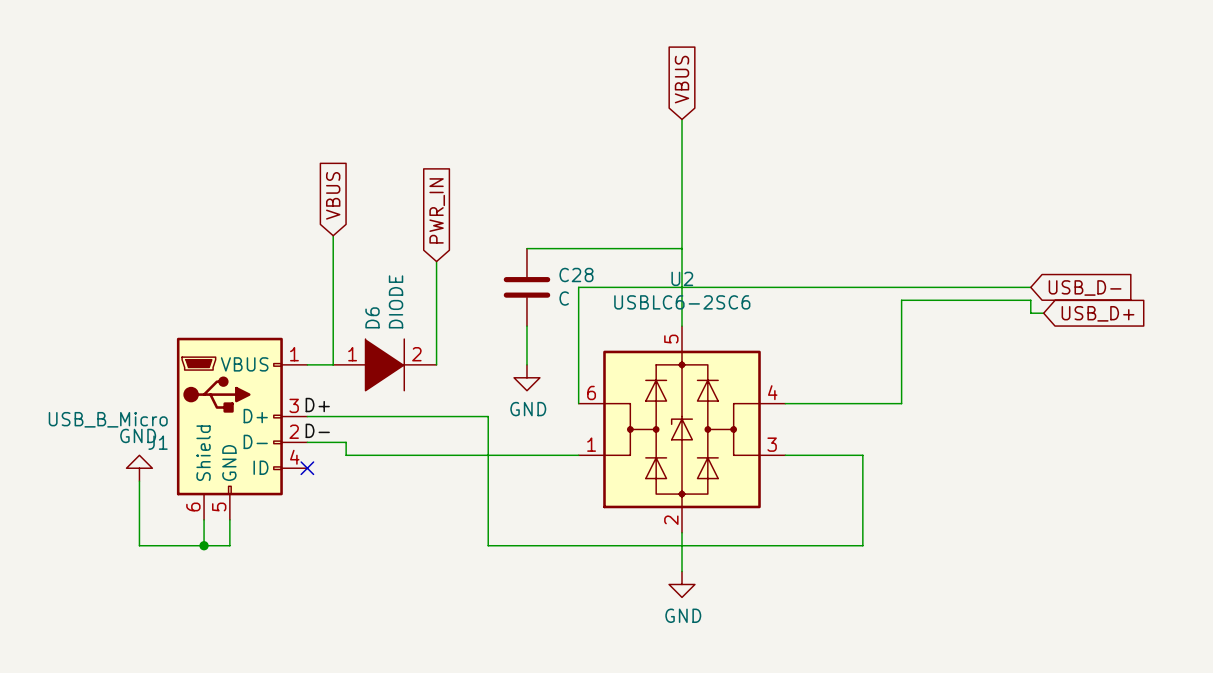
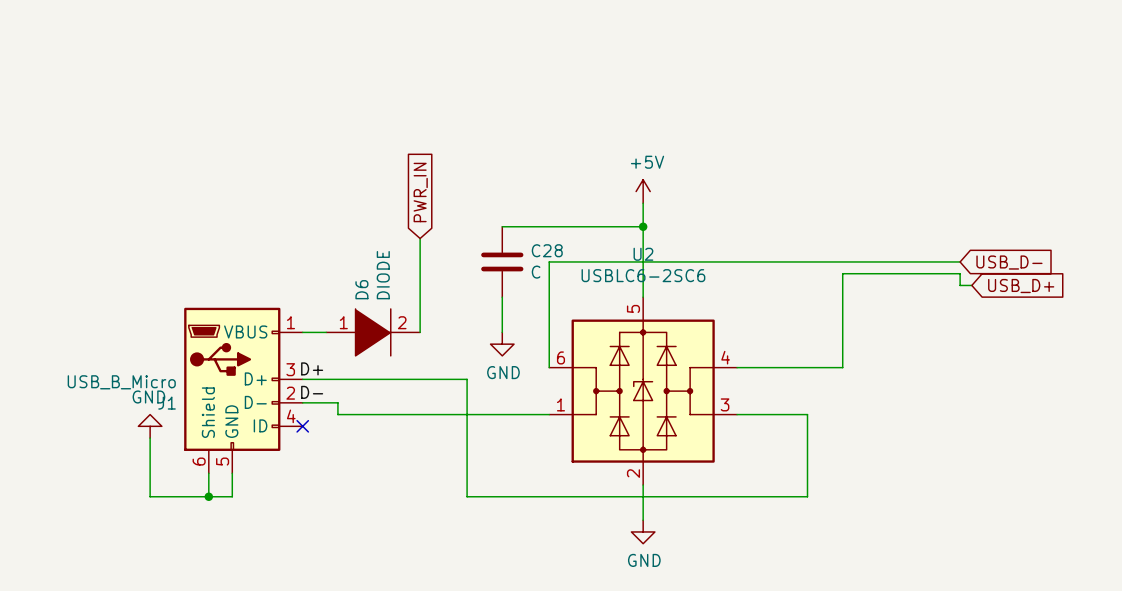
global label: VBUS (682, 79) -> none
wire: (682, 119) (682, 222) -> none
global label: VBUS (333, 195) -> none
power symbol: none -> +5V (643, 191)
wire: (333, 235) (333, 364) -> none
junction: none -> (643, 226)

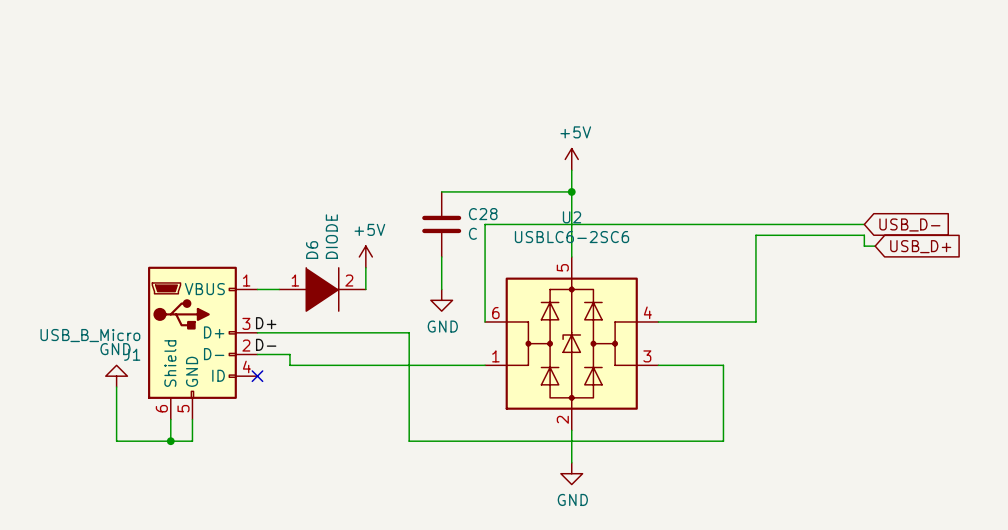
global label: PWR_IN (420, 192) -> none
wire: (420, 238) (420, 308) -> none
power symbol: none -> +5V (365, 256)

